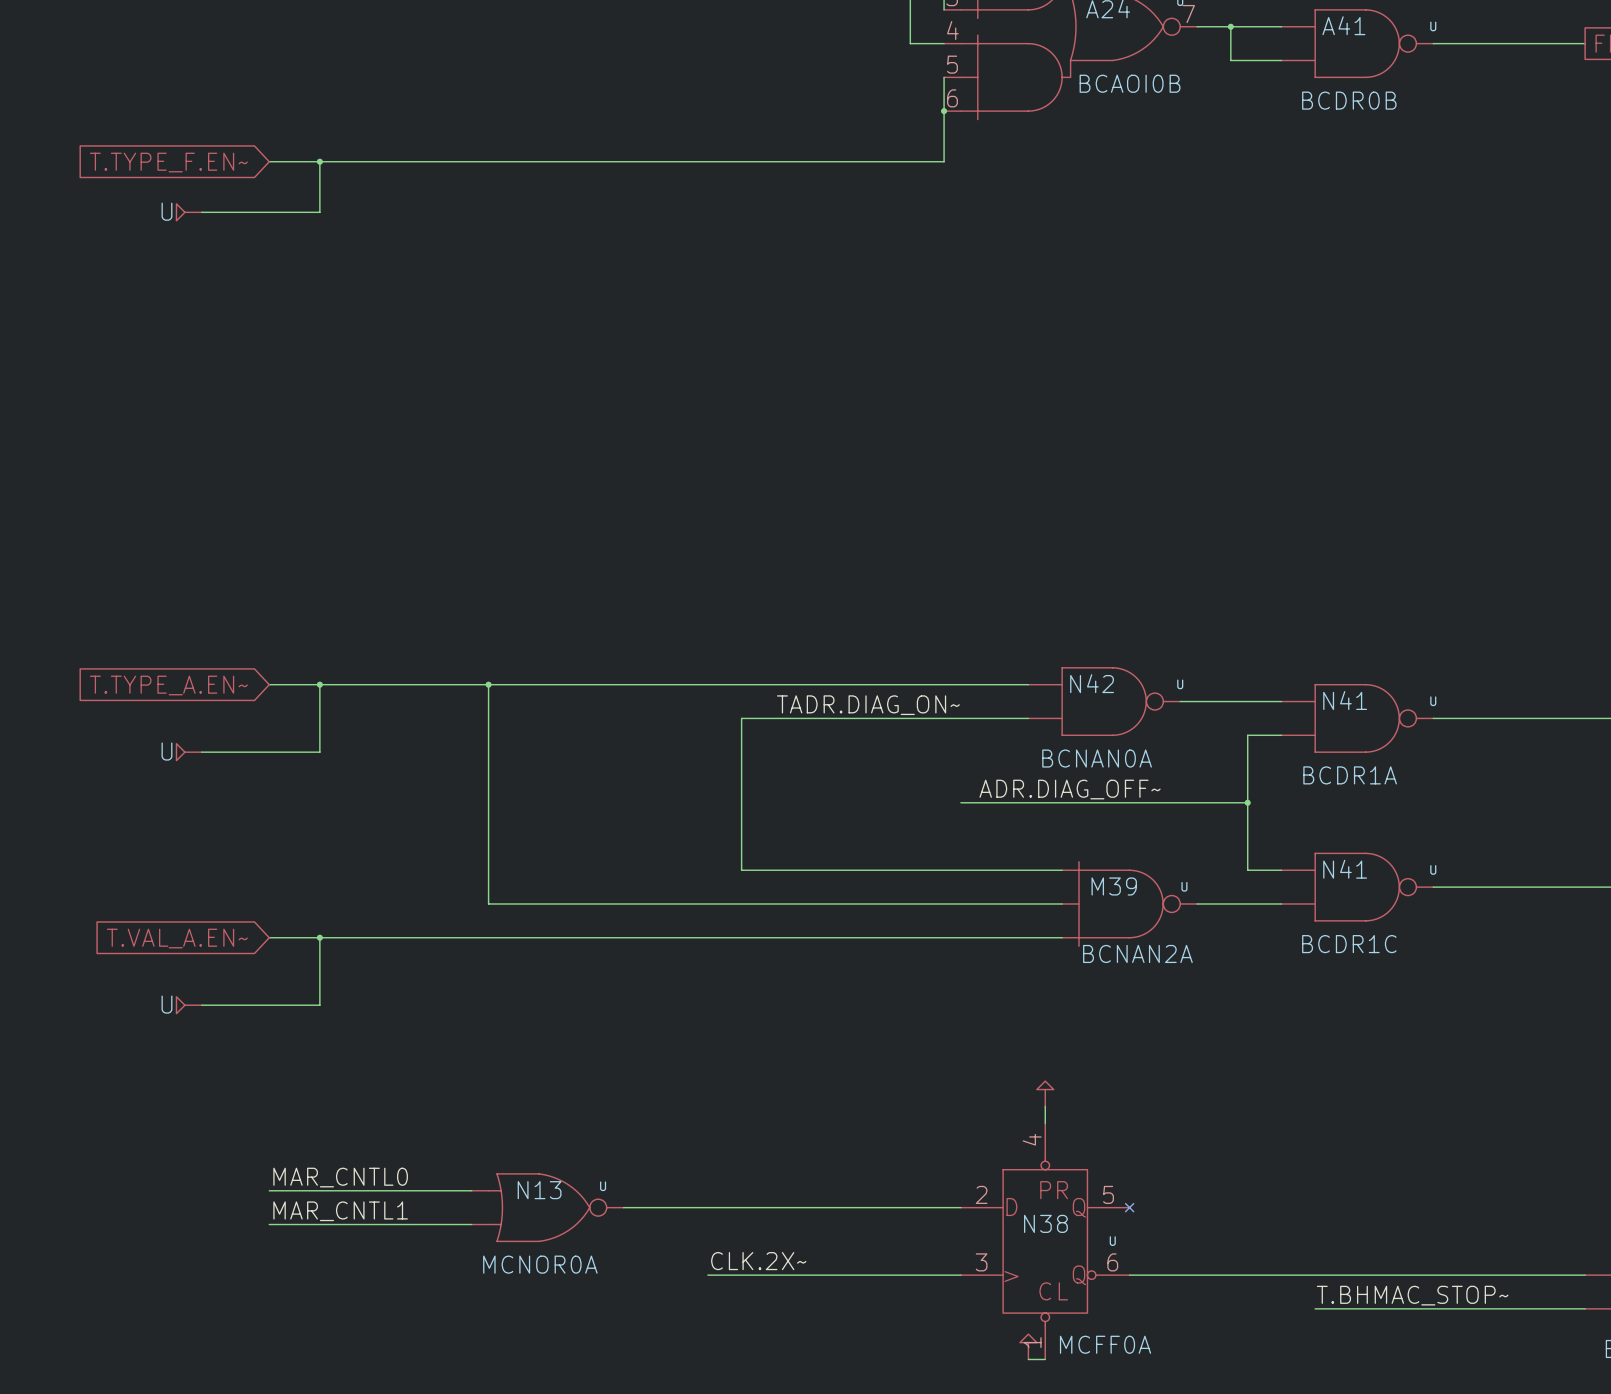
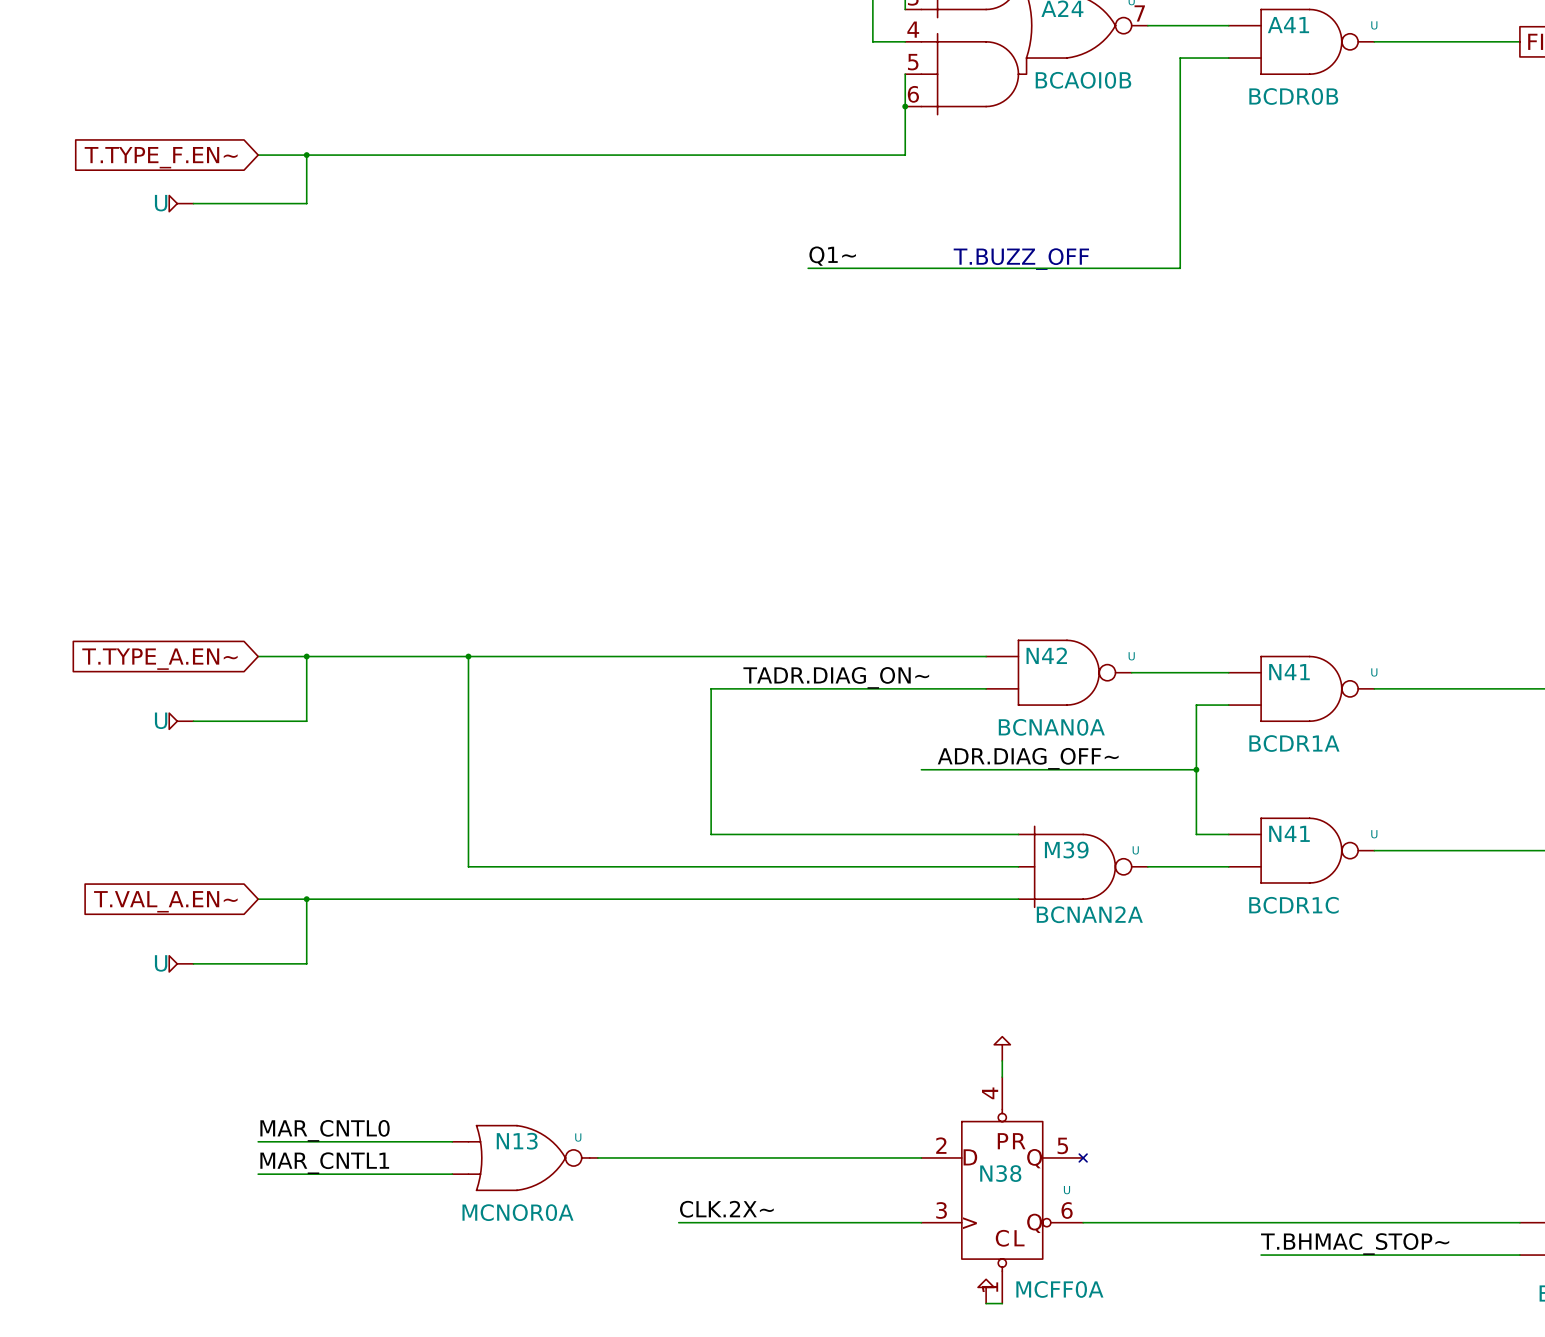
wire: (1230, 26) (1230, 60) -> (808, 268) (1180, 268) (1180, 58)
junction: (1230, 26) -> none
label: none -> Q1~ (832, 256)
text: none -> T.BUZZ_OFF (1021, 259)

